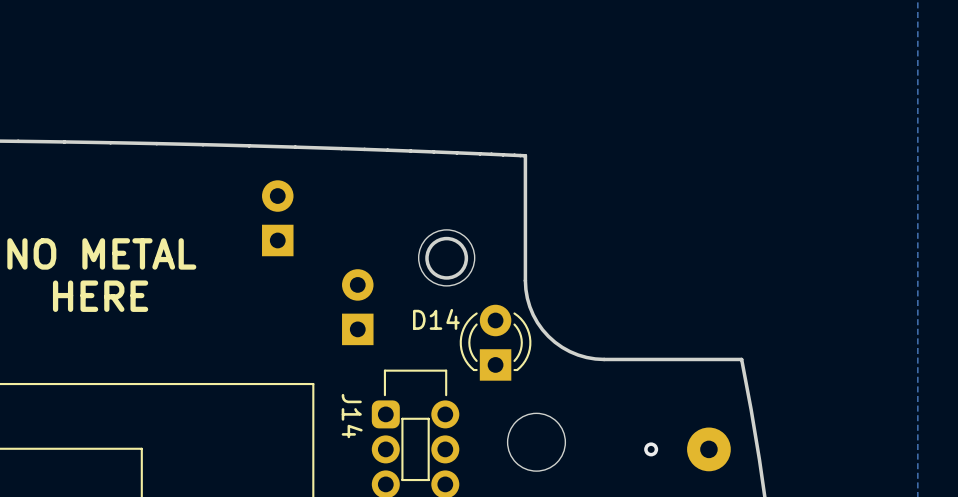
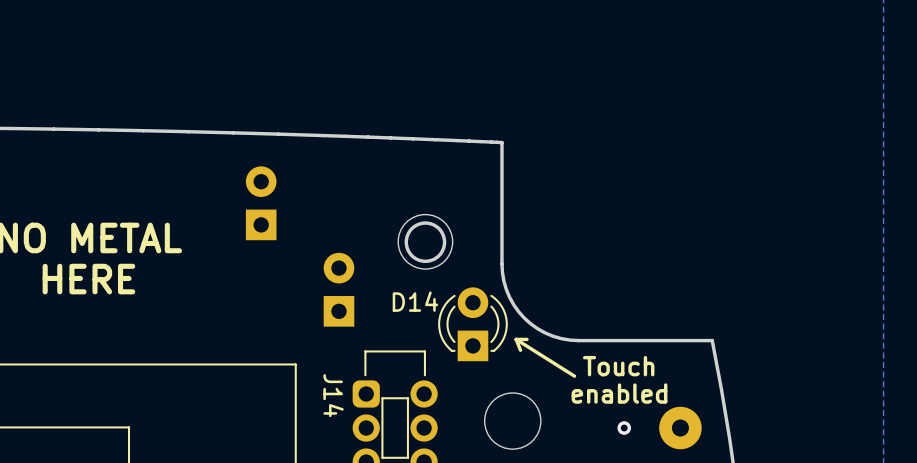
line: none -> (516, 339) (520, 350)
line: none -> (516, 339) (574, 376)
line: none -> (526, 339) (516, 339)
text: none -> Touch (618, 366)
text: none -> enabled (619, 393)

